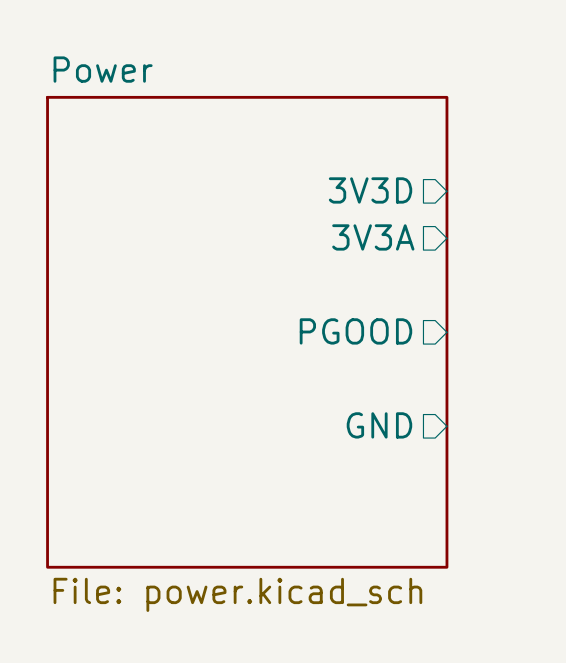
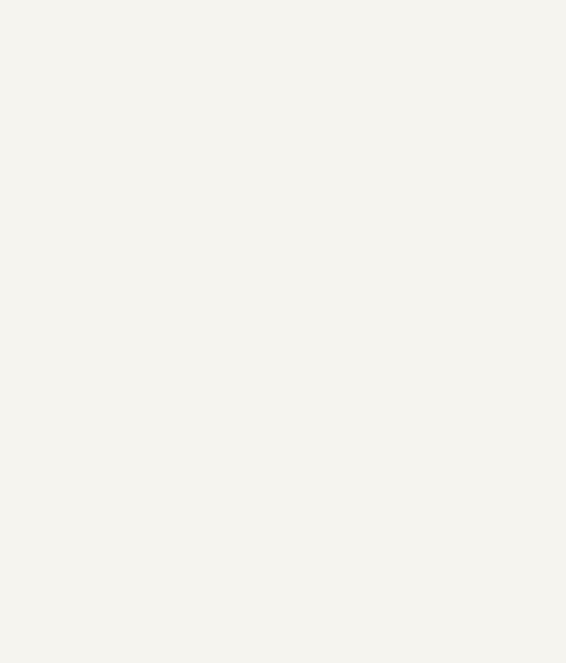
sheet pin: 3V3D (370, 190) -> none
sheet pin: 3V3A (373, 237) -> none
sheet pin: PGOOD (355, 331) -> none
sheet Power: File: power.kicad_sch (247, 332) -> none
sheet pin: GND (379, 425) -> none

